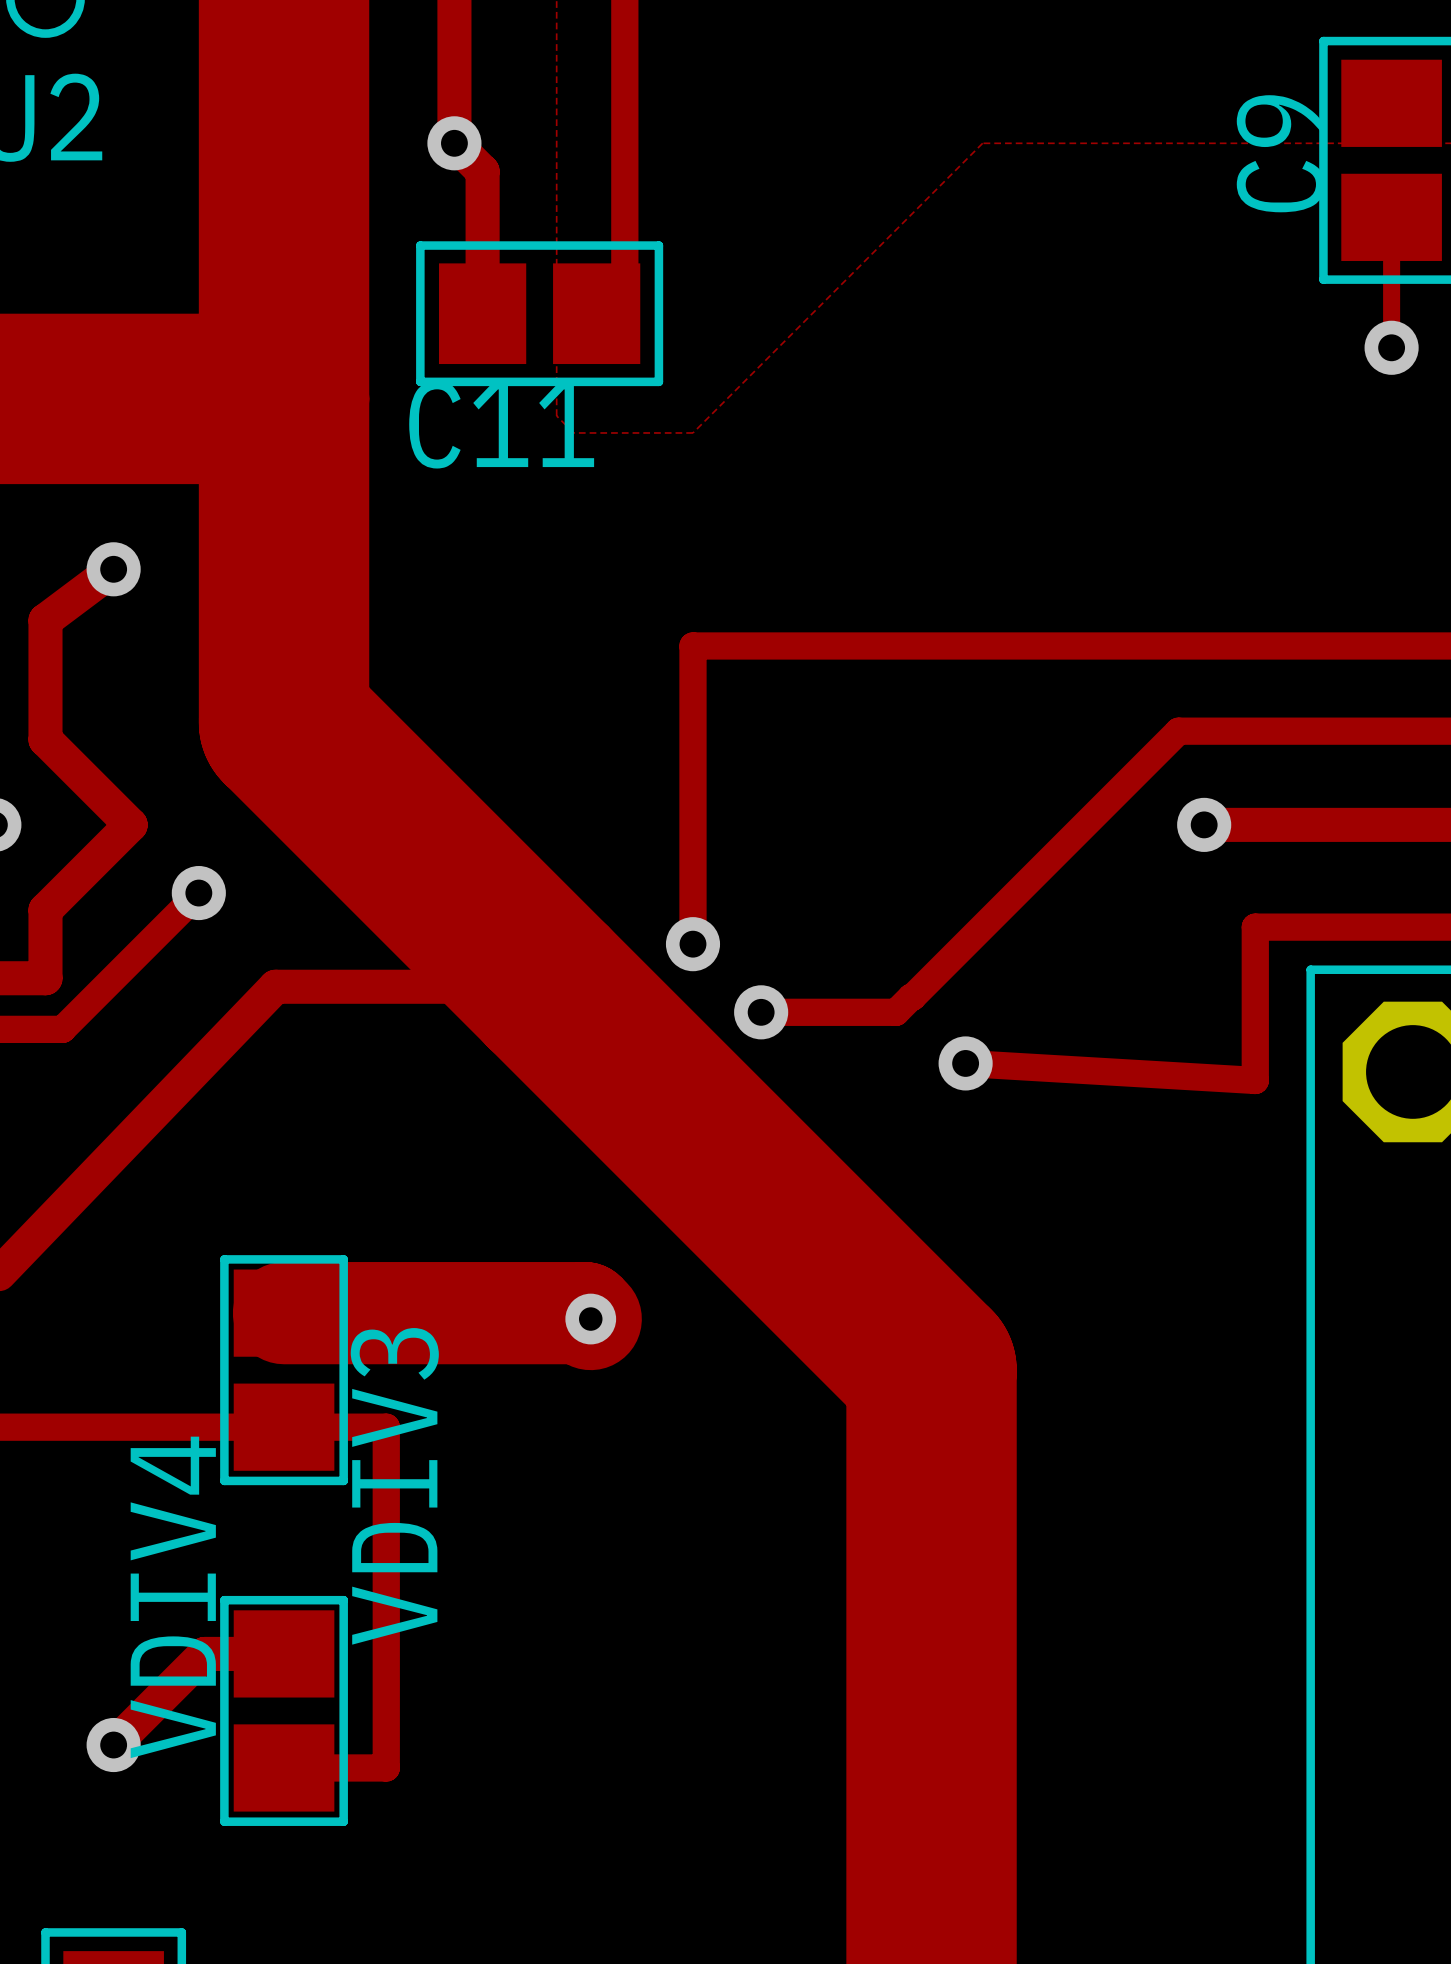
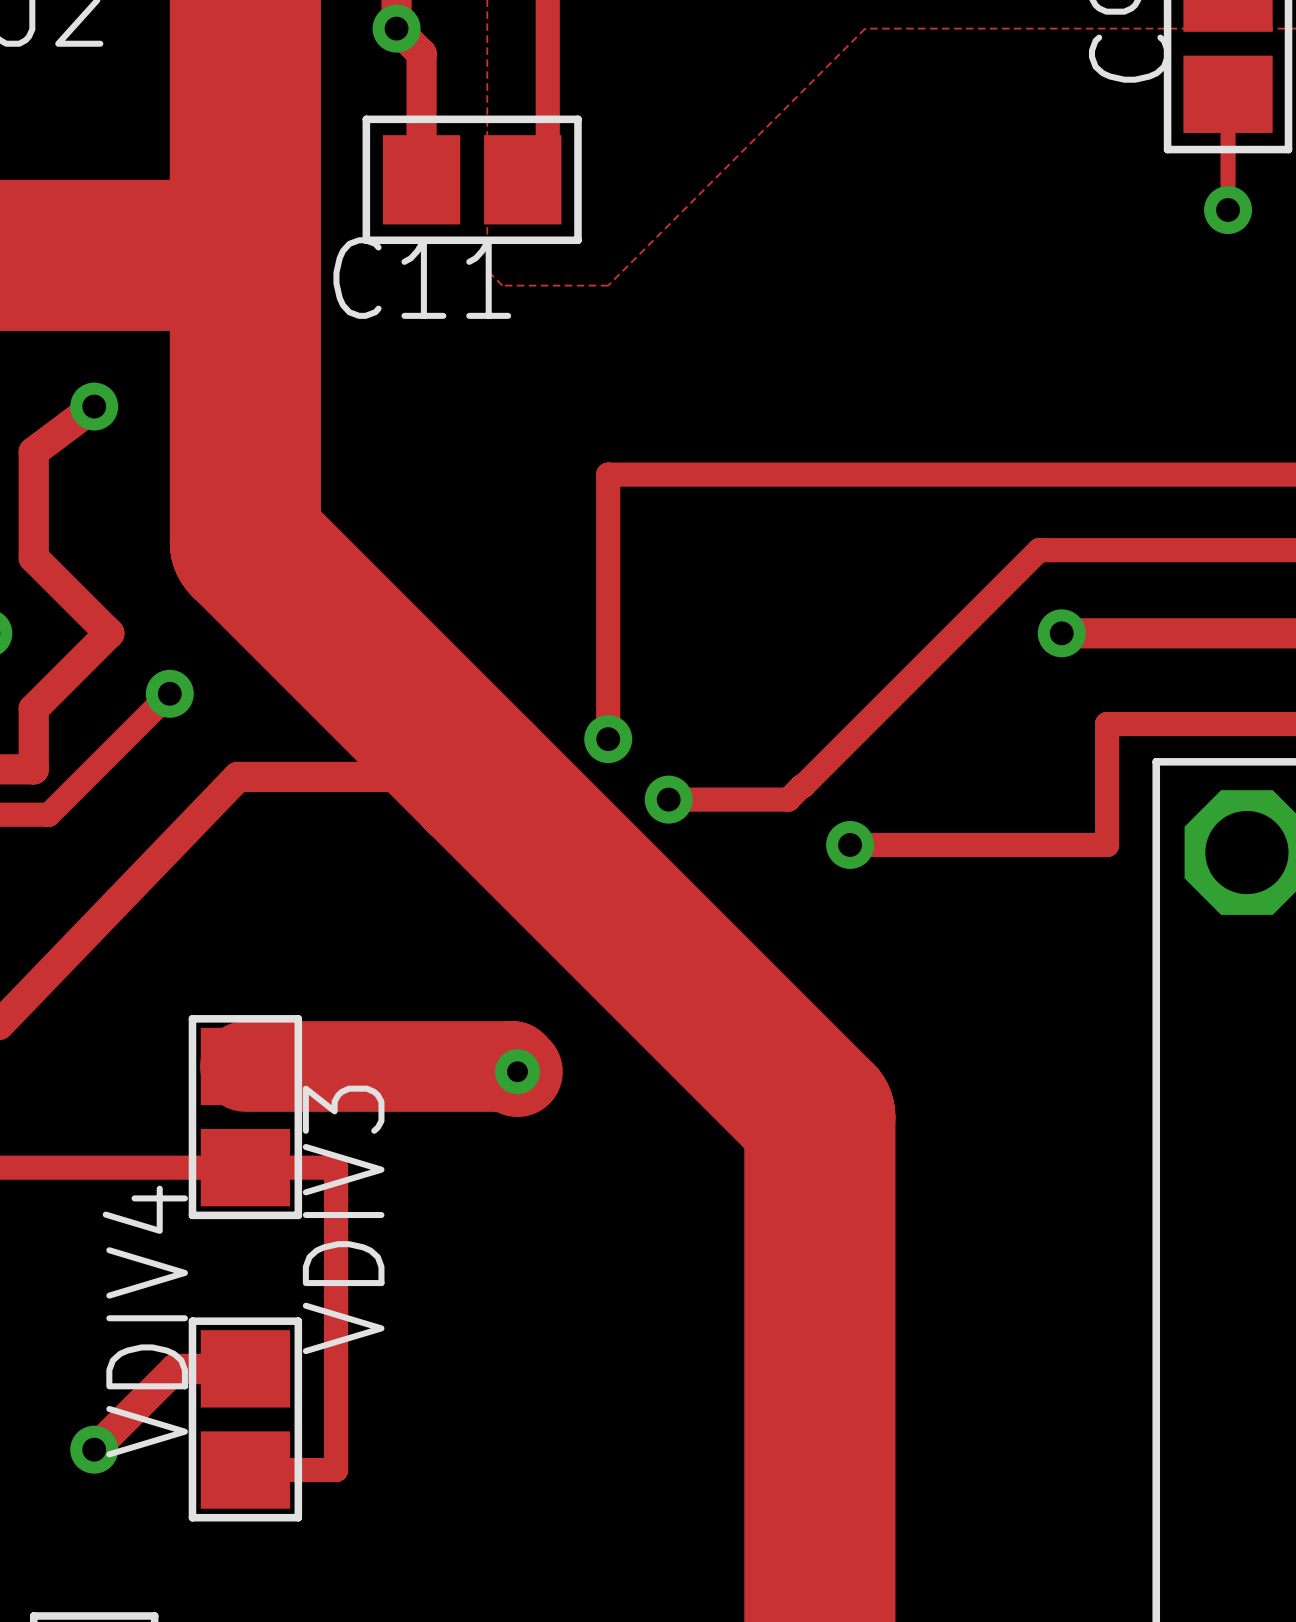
track: (965, 1063) (1255, 1080) (1255, 1063) -> (850, 844) (1107, 844)

